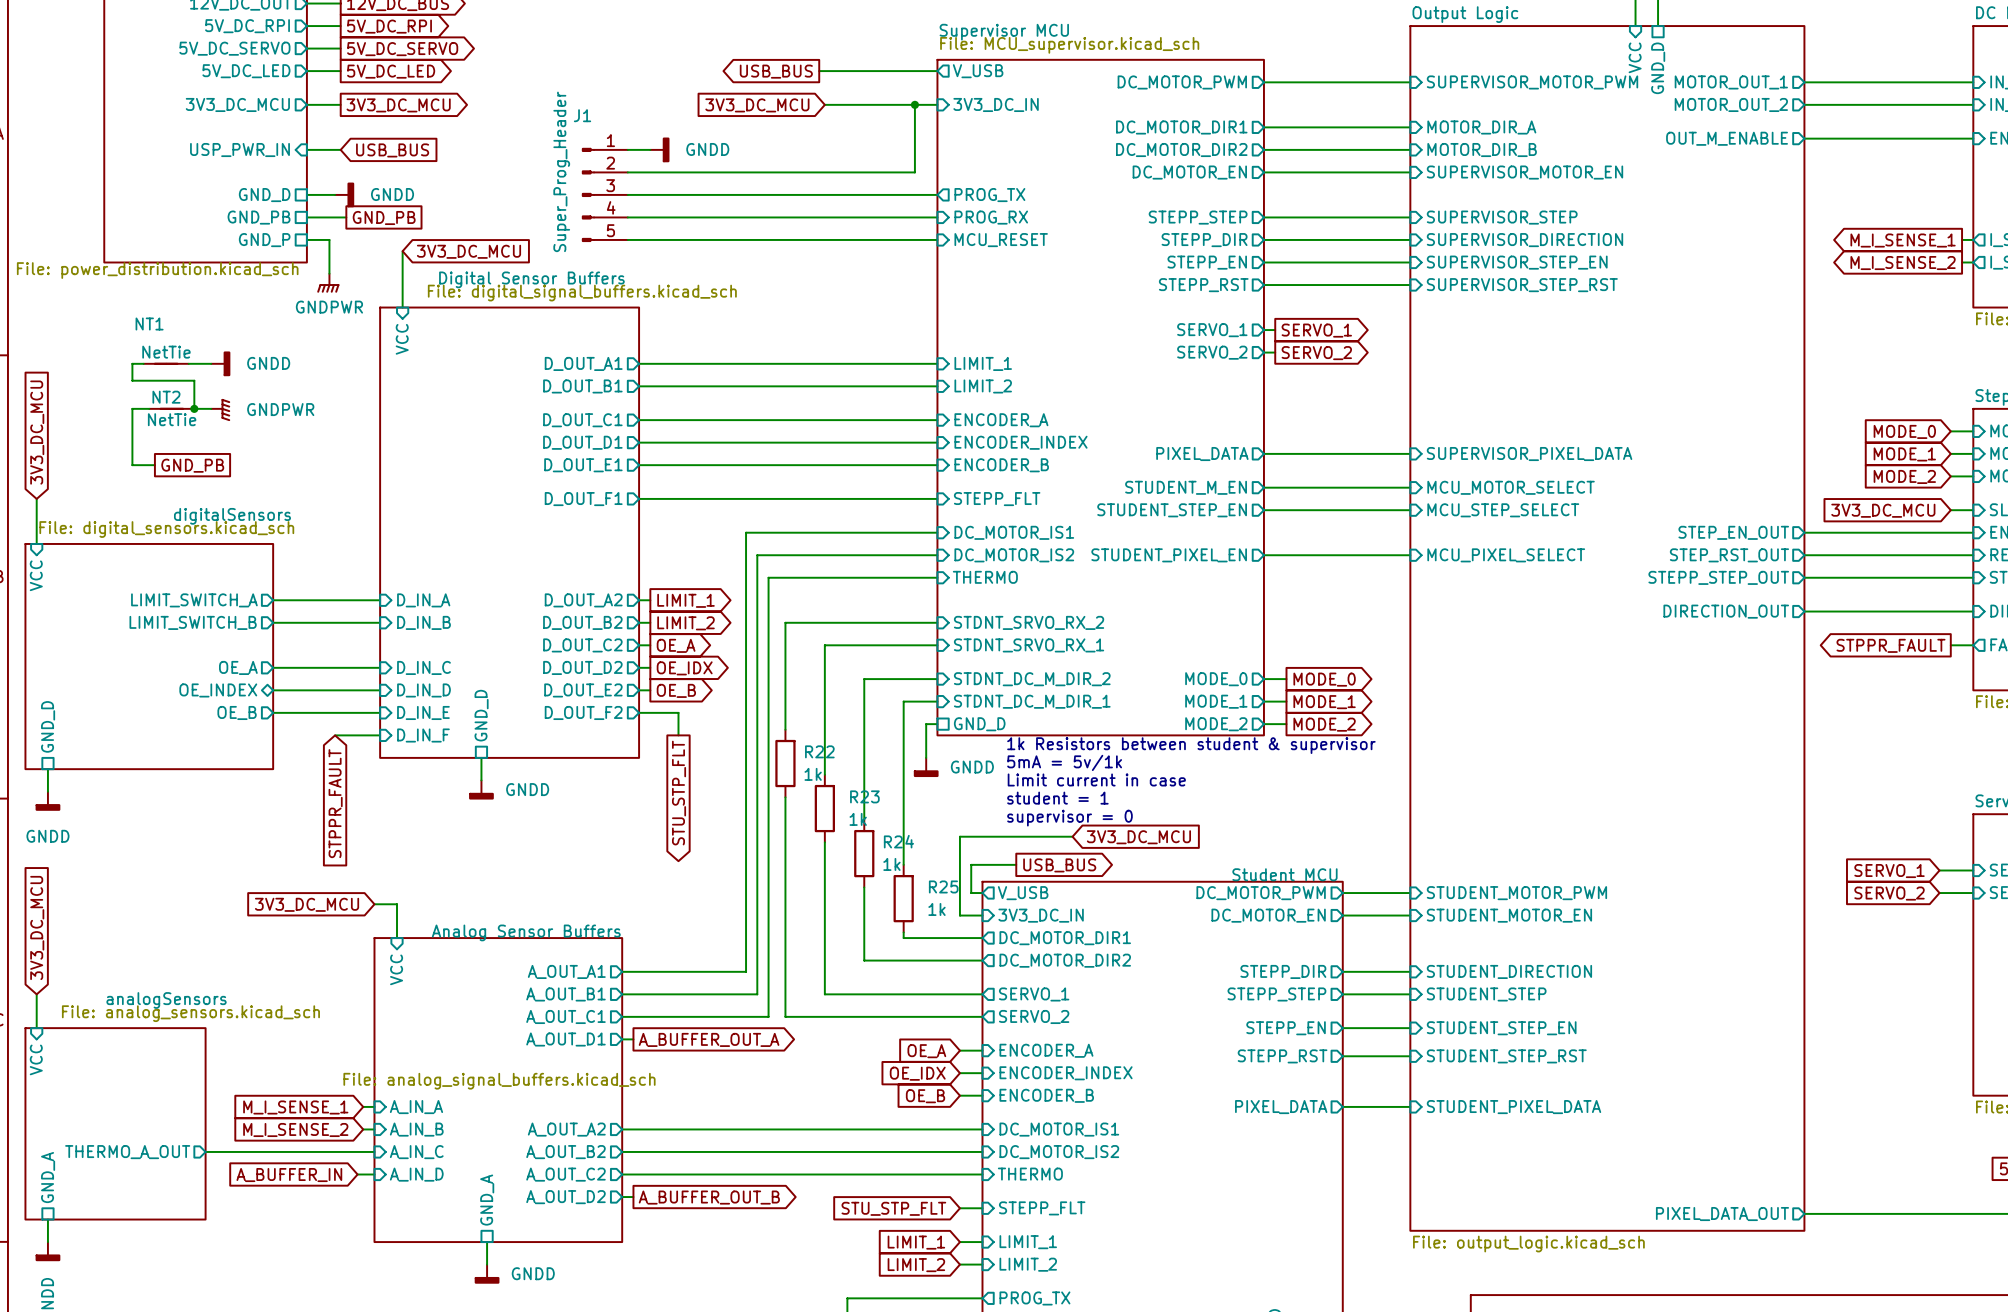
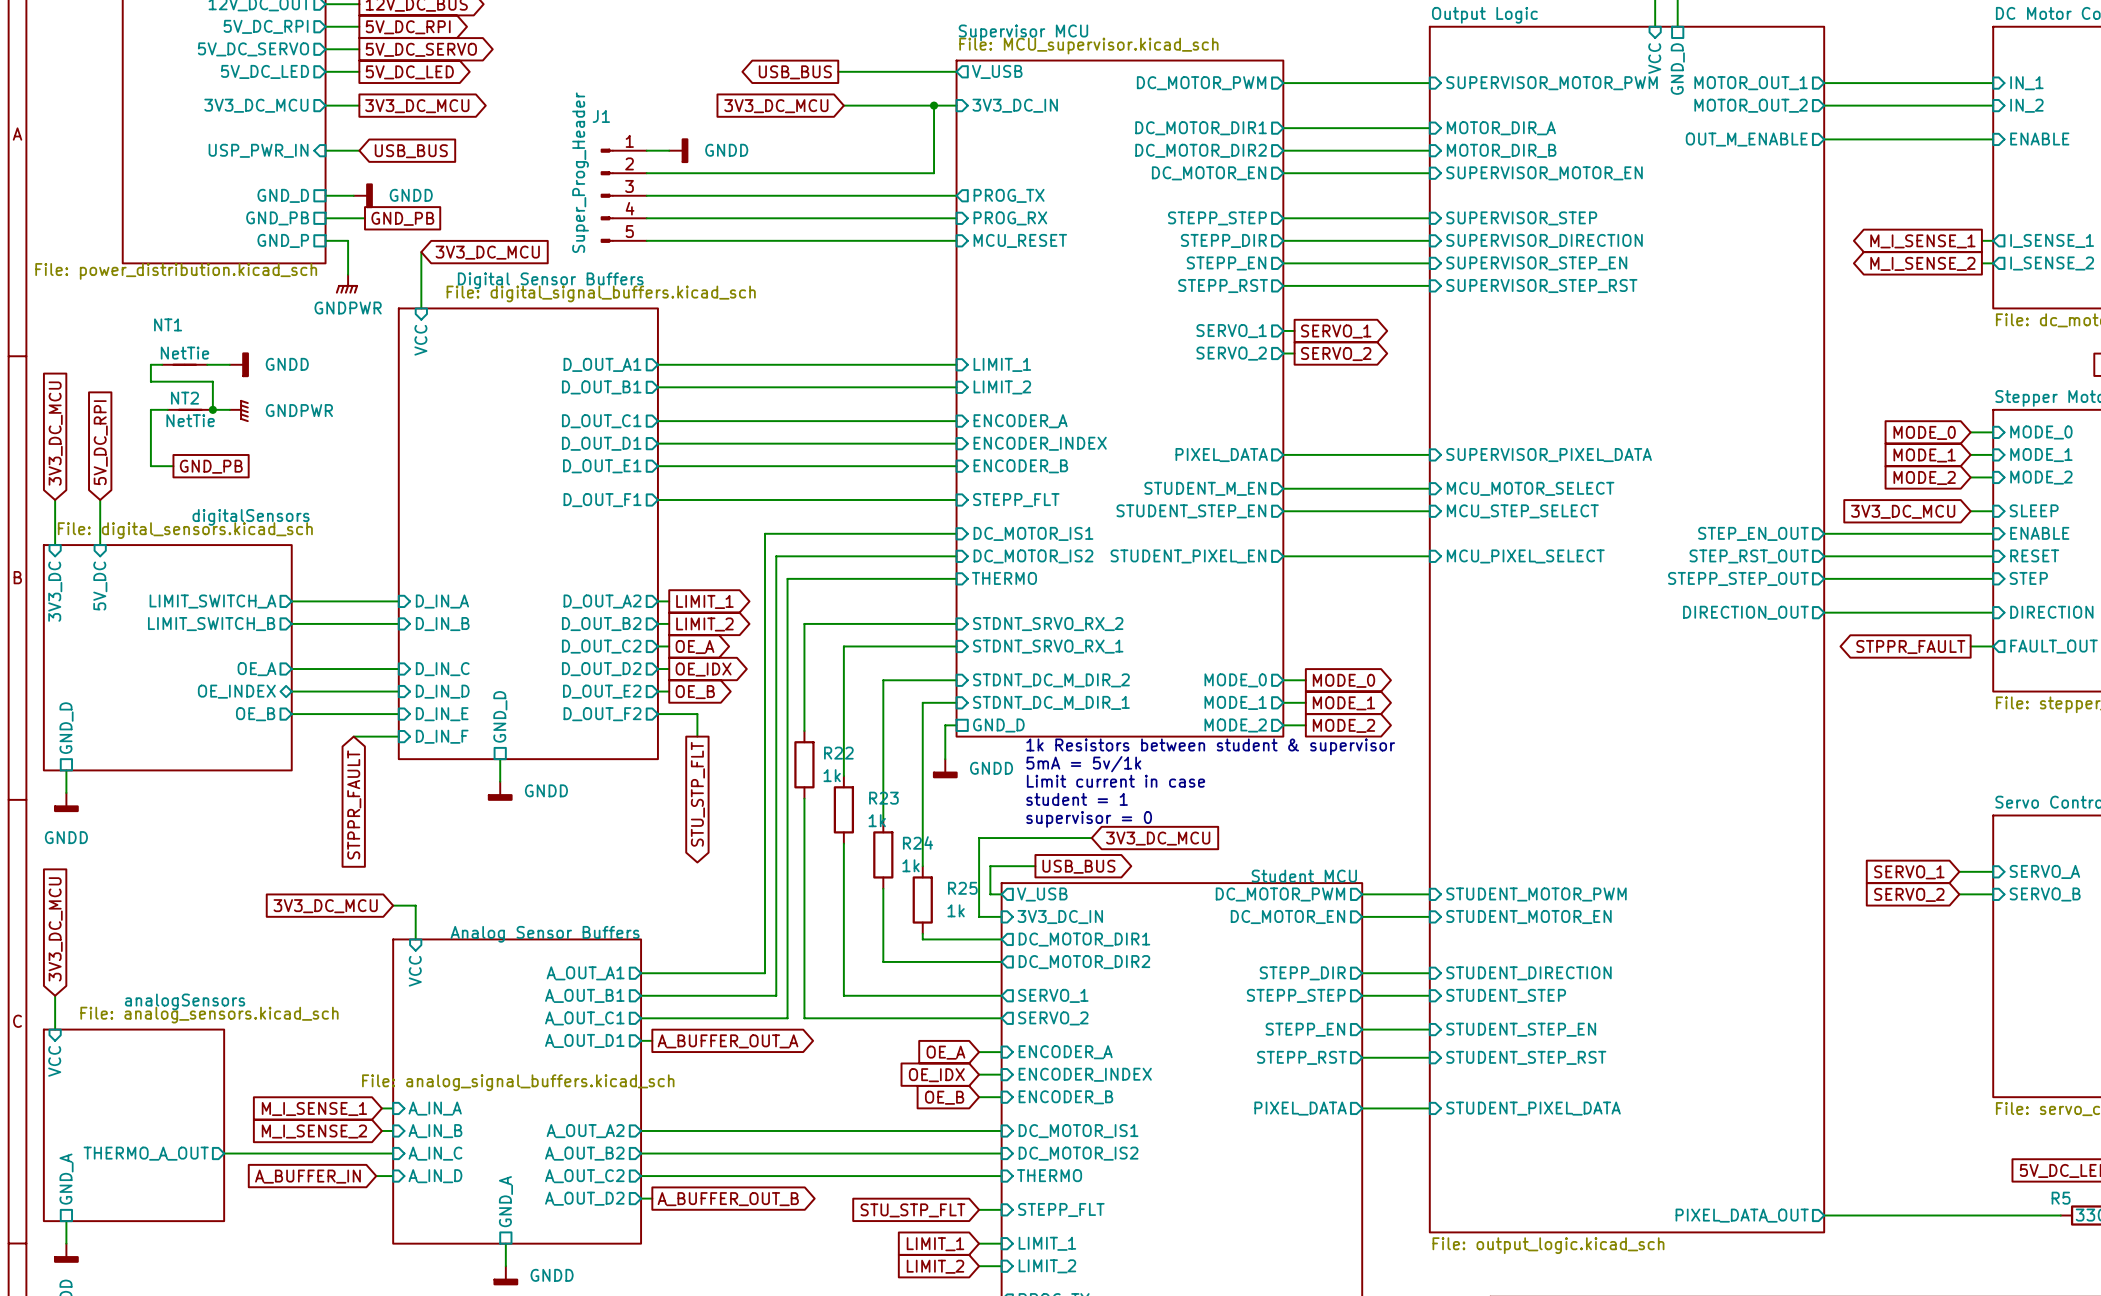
global label: none -> 5V_DC_RPI (100, 442)
wire: none -> (100, 499) (100, 545)
sheet pin: VCC (36, 575) -> 3V3_DC (55, 591)
sheet pin: none -> 5V_DC (100, 586)

